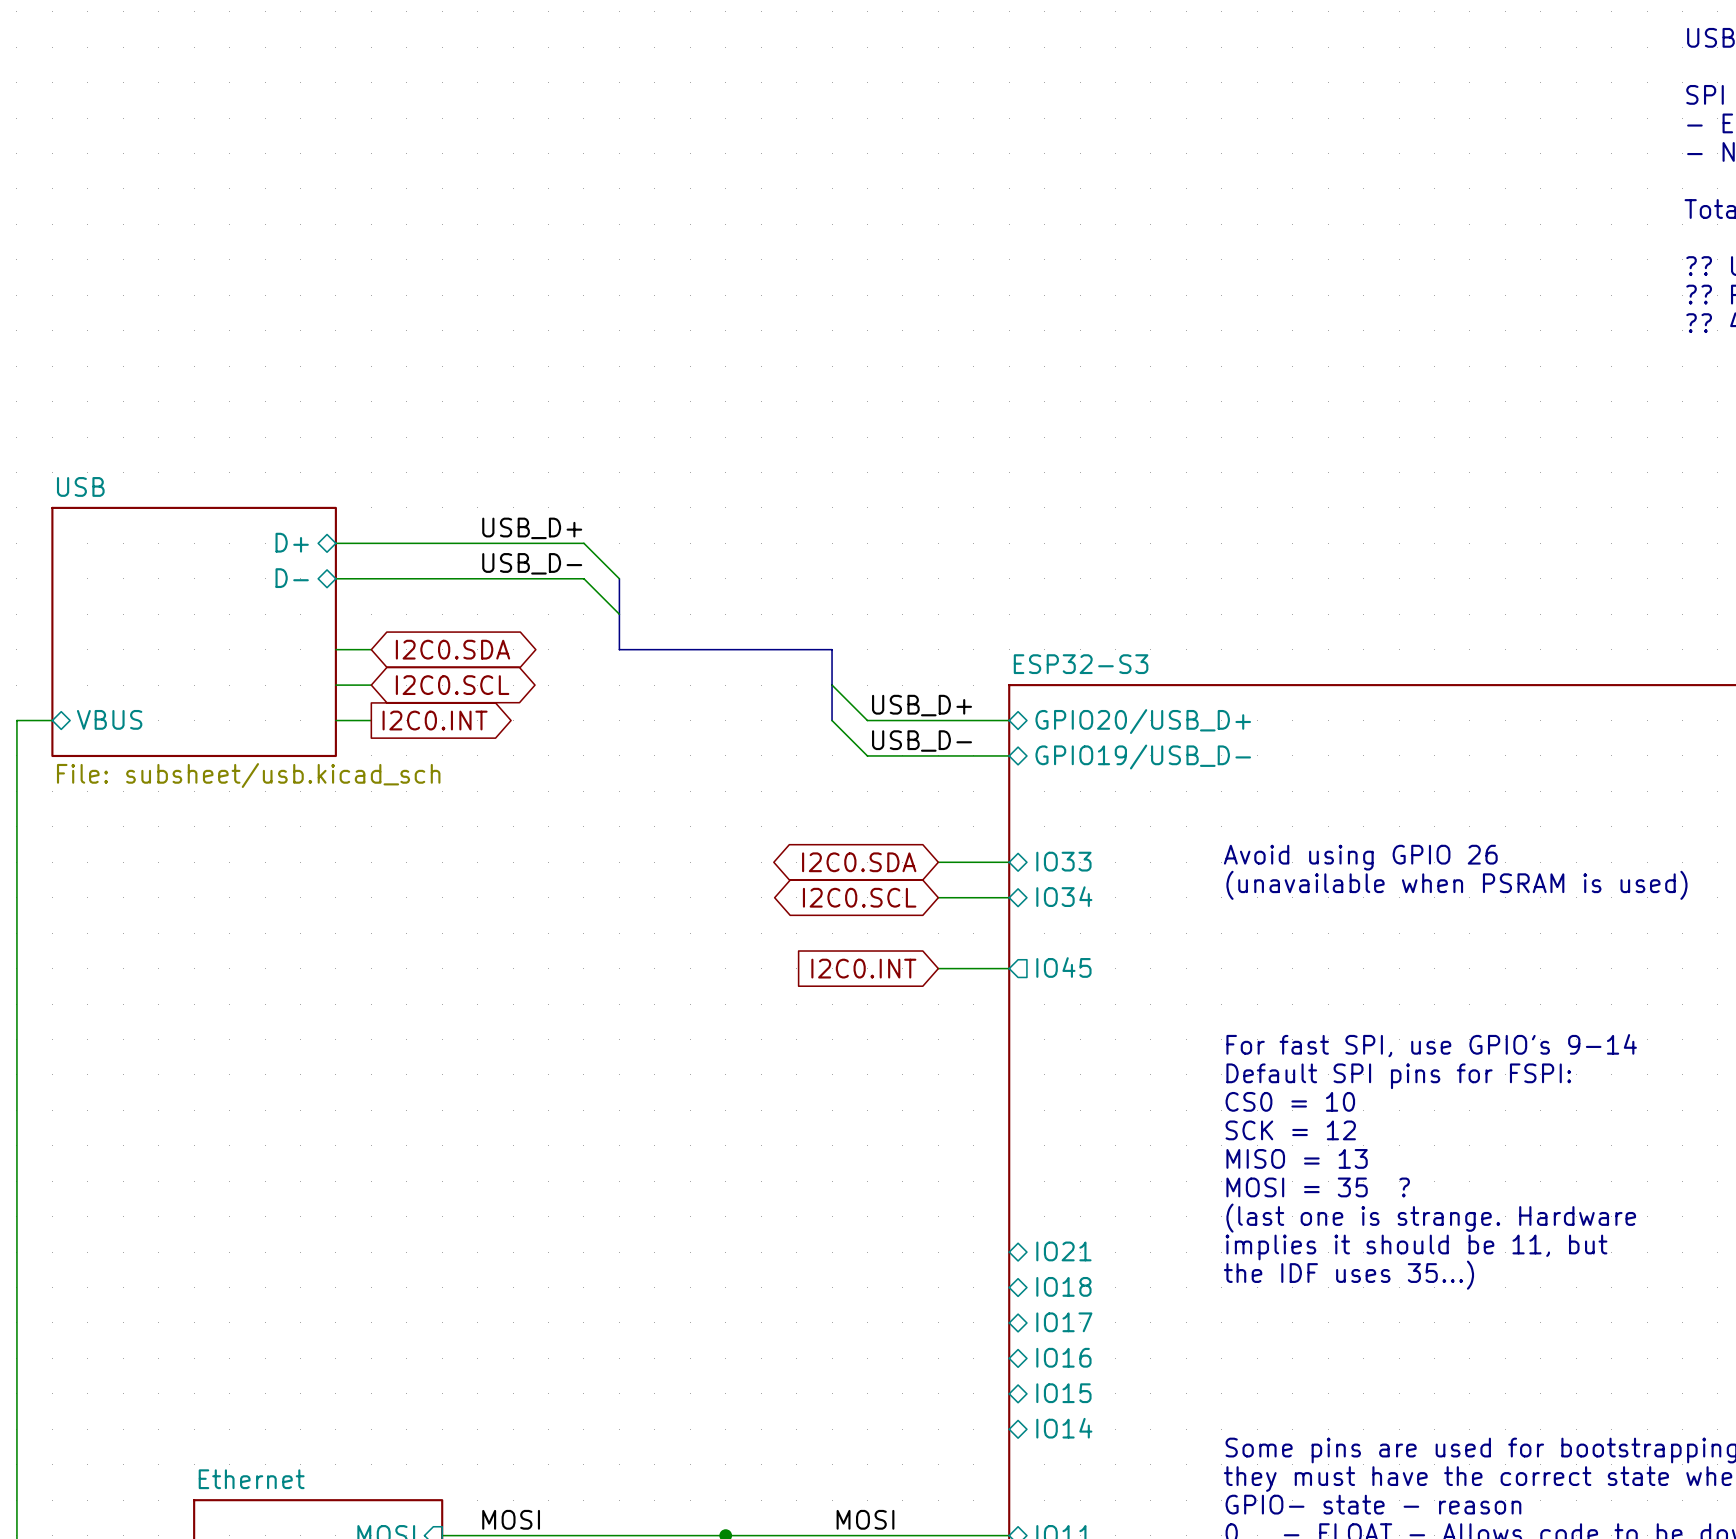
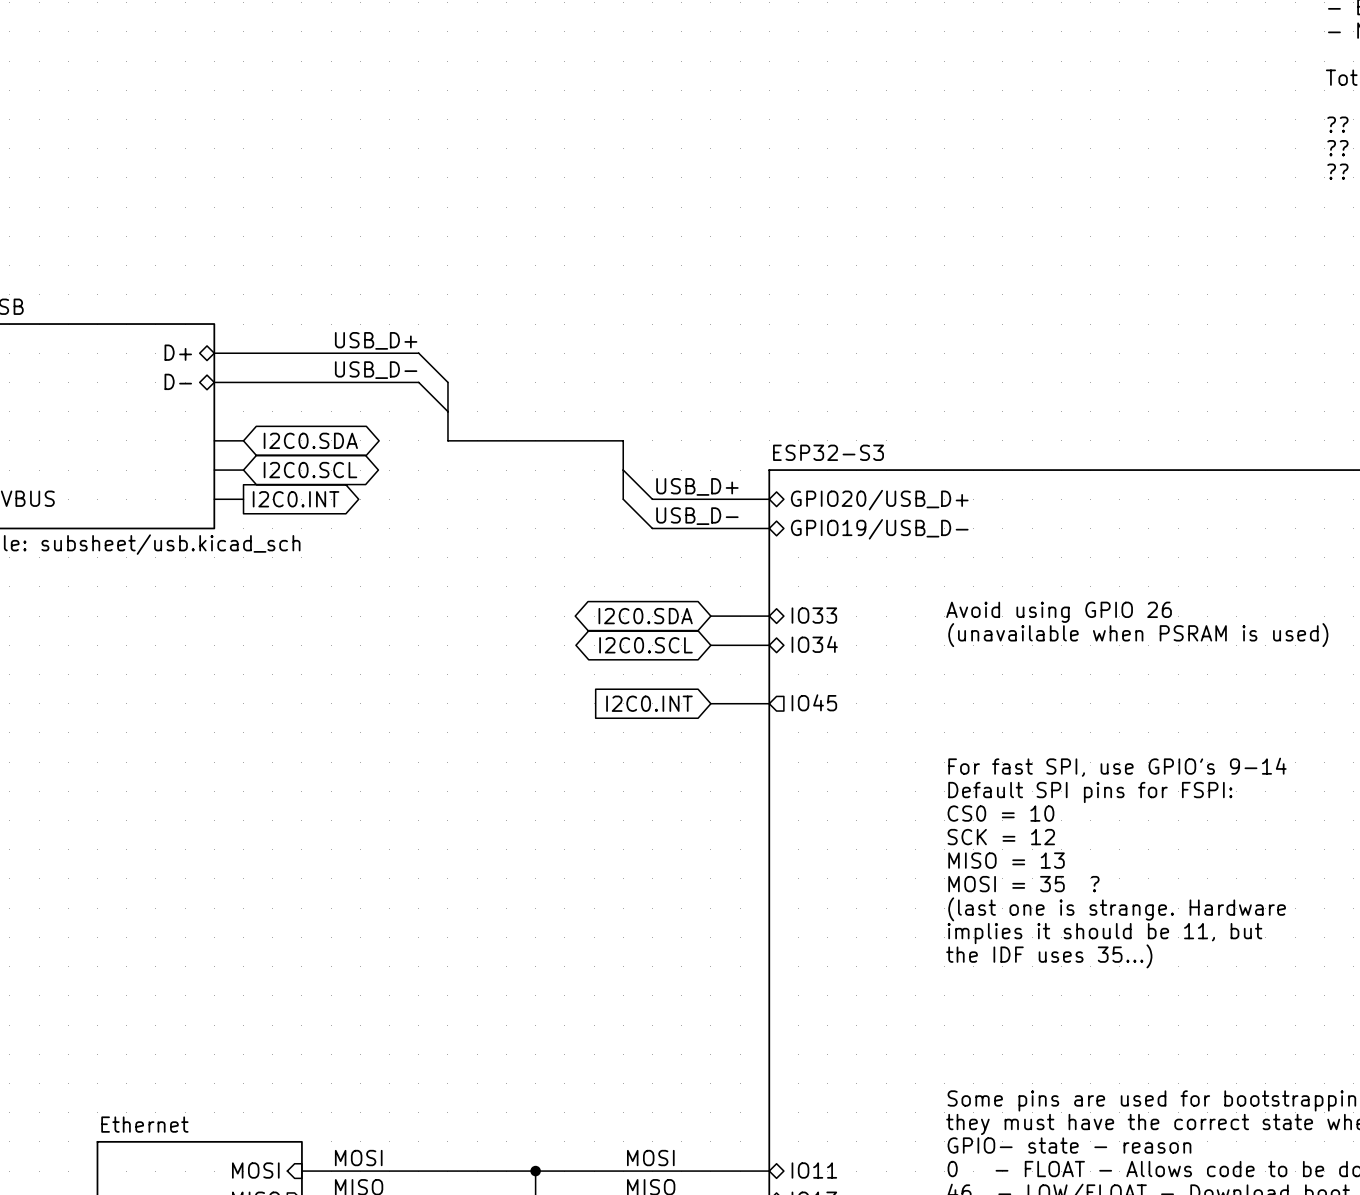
sheet pin: IO21 (1063, 1251) -> none
sheet pin: IO18 (1063, 1286) -> none
sheet pin: IO17 (1064, 1322) -> none
sheet pin: IO16 (1063, 1357) -> none
sheet pin: IO15 (1063, 1393) -> none
sheet pin: IO14 (1064, 1428) -> none

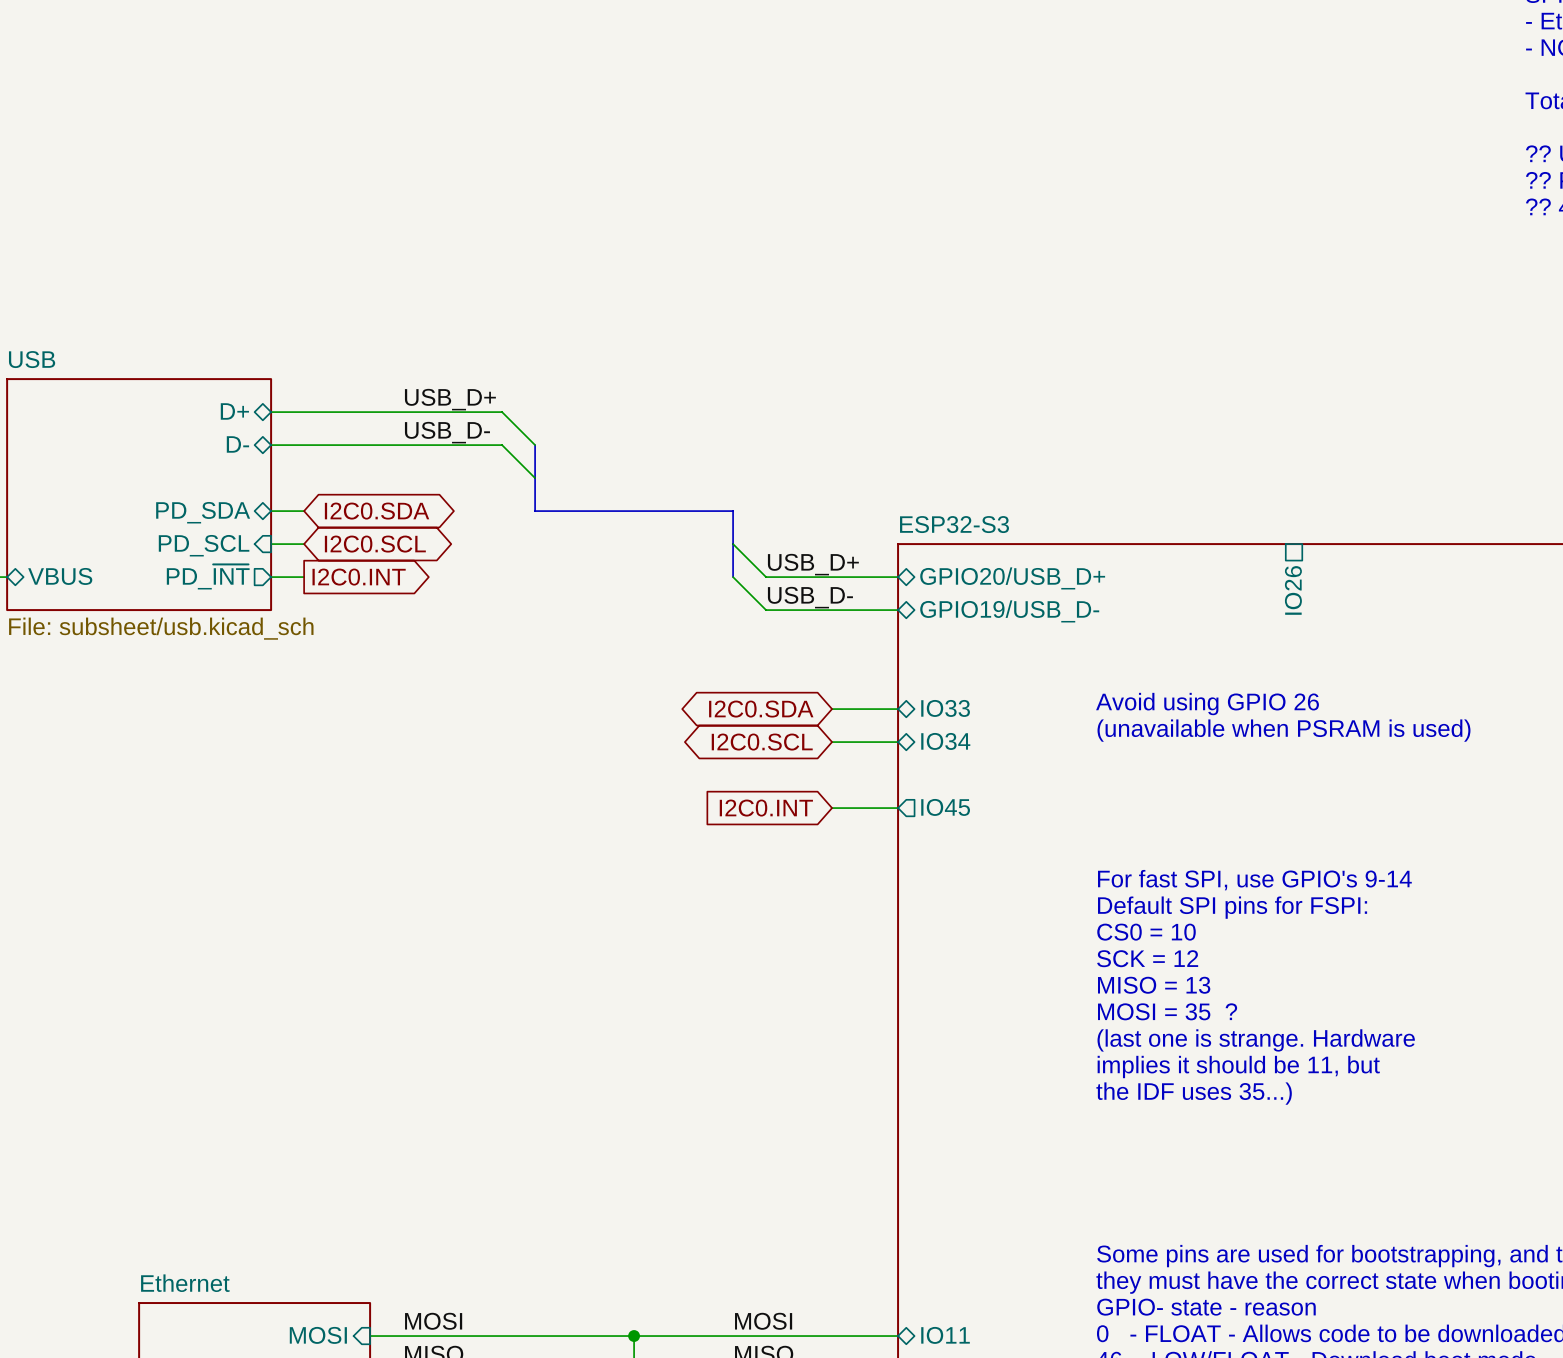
sheet pin: none -> PD_SDA (203, 512)
sheet pin: none -> PD_SCL (204, 545)
sheet pin: none -> PD_~{INT} (208, 576)
sheet pin: none -> IO26 (1293, 590)

